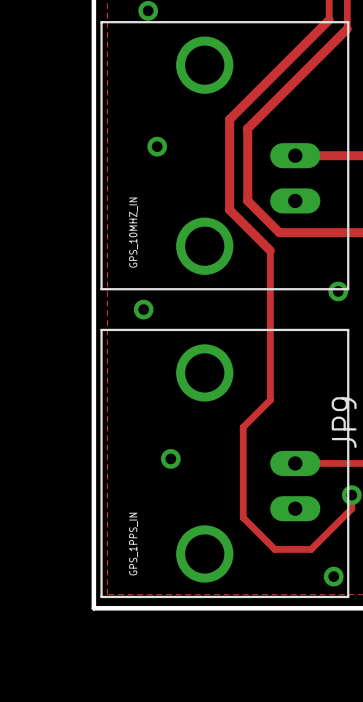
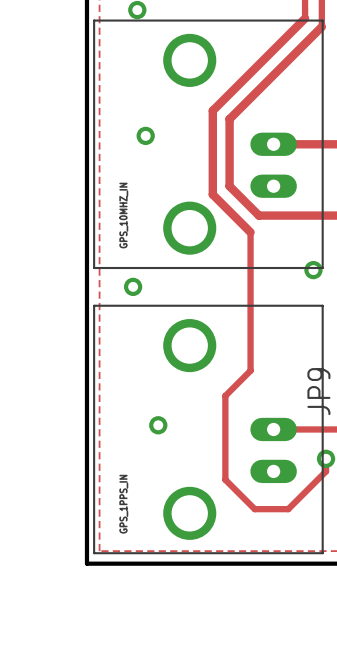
via: (333, 576) -> none

